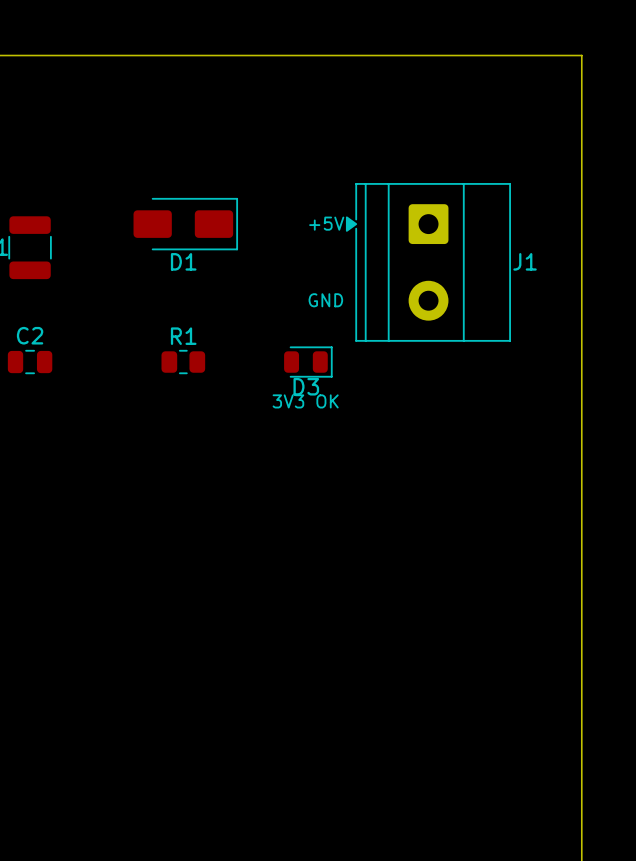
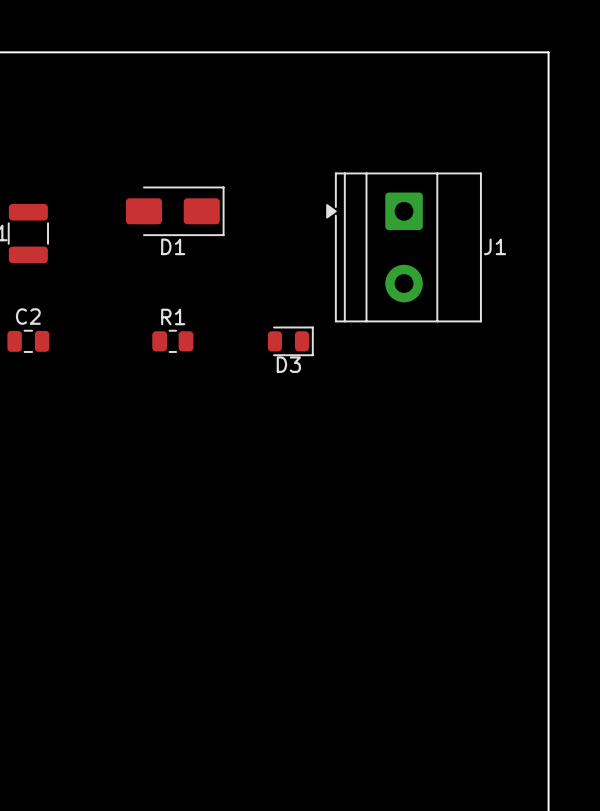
text: +5V (326, 223) -> none
text: GND (325, 300) -> none
text: 3V3 OK (305, 401) -> none

